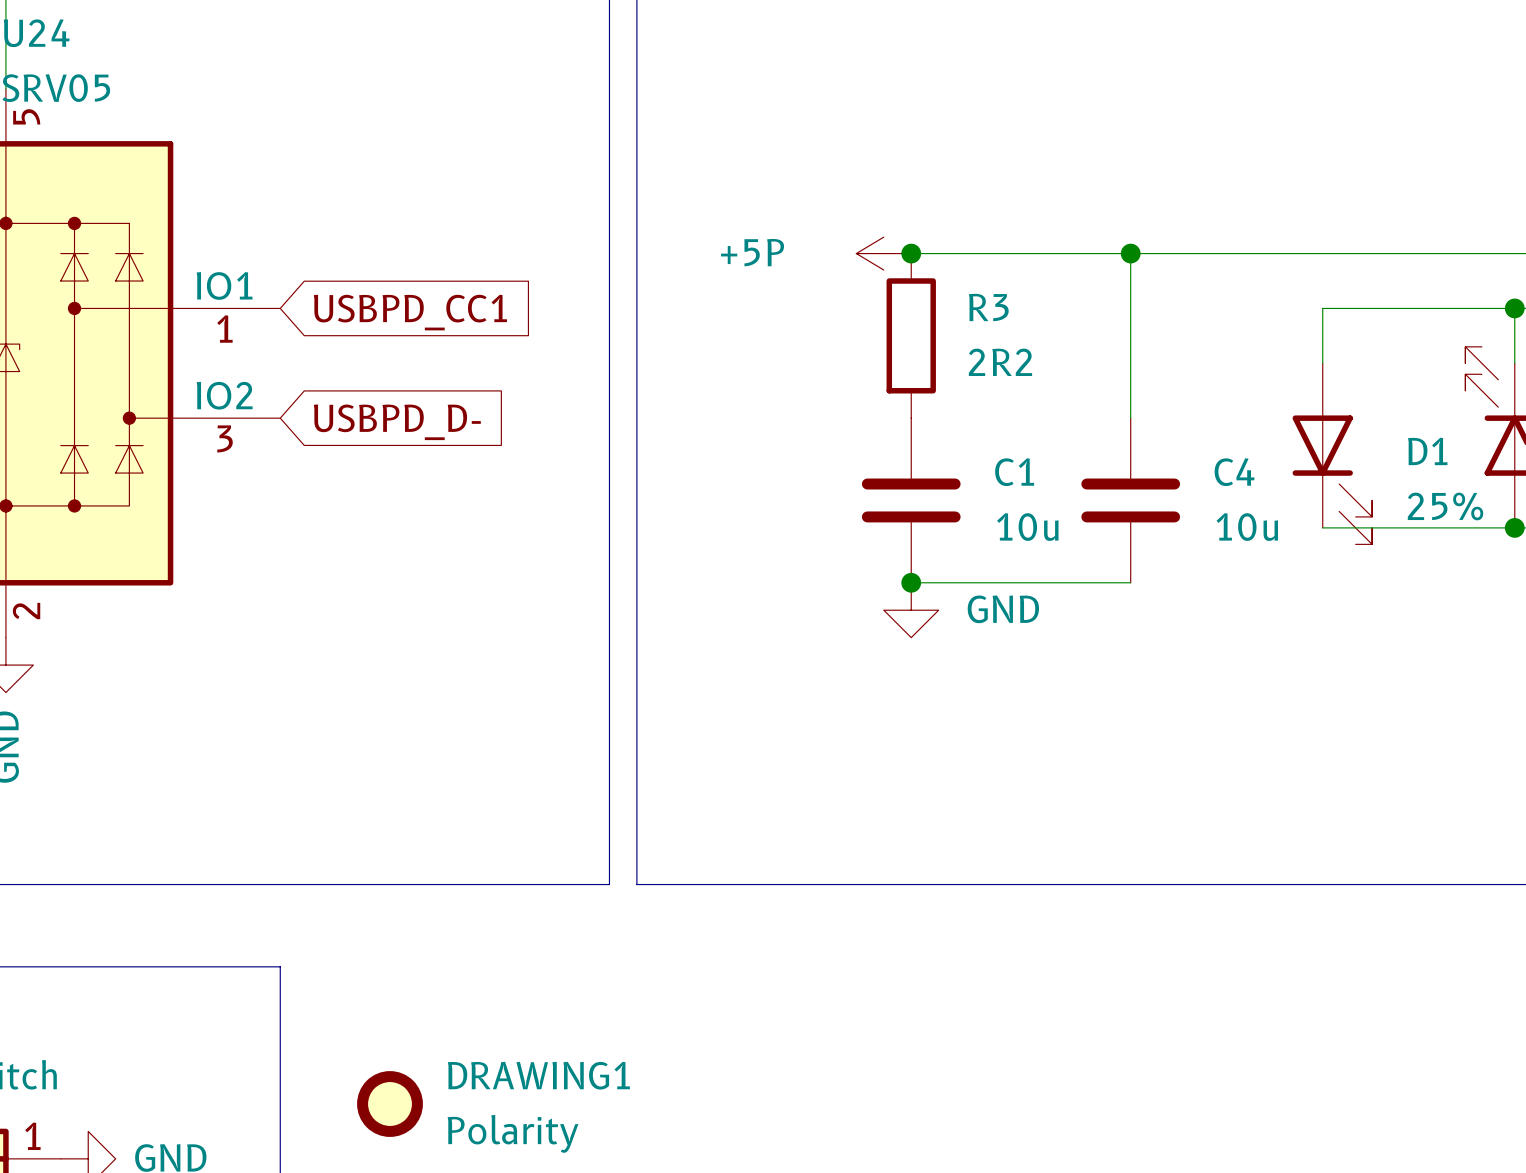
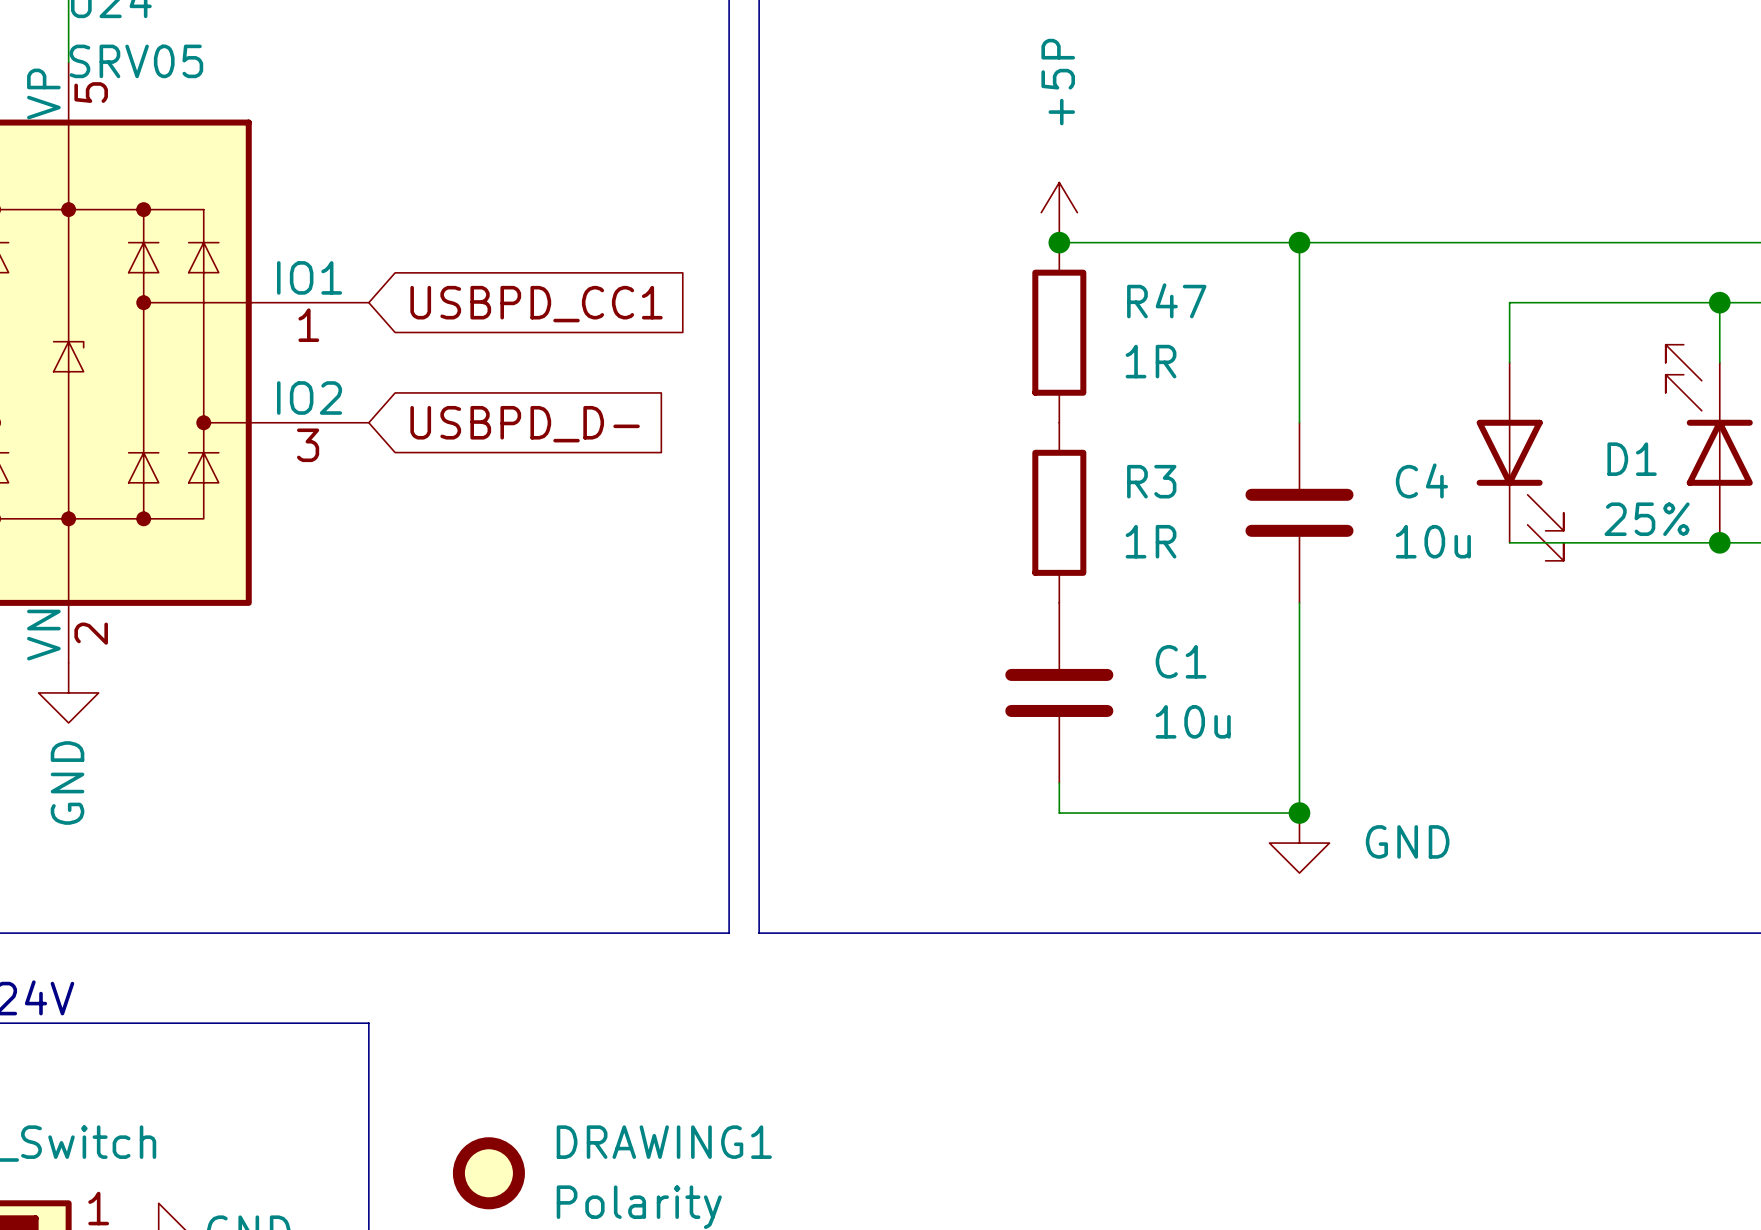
power symbol rotation: 0° (883, 253) -> 90° clockwise (1059, 212)
power symbol position: +5P (883, 253) -> +5P (1059, 212)
R3 name: R3 (988, 307) -> R47 (1166, 300)
R3 value: 2R2 (1000, 362) -> 1R (1151, 361)
C1 position: (911, 500) -> (1059, 692)
R3: none -> 1R (1059, 512)
wire: (911, 582) (1130, 582) -> (1059, 783) (1059, 813) (1299, 813) (1299, 602)
junction: (911, 582) -> none
power symbol position: GND (911, 610) -> GND (1299, 843)
junction: none -> (1299, 813)

